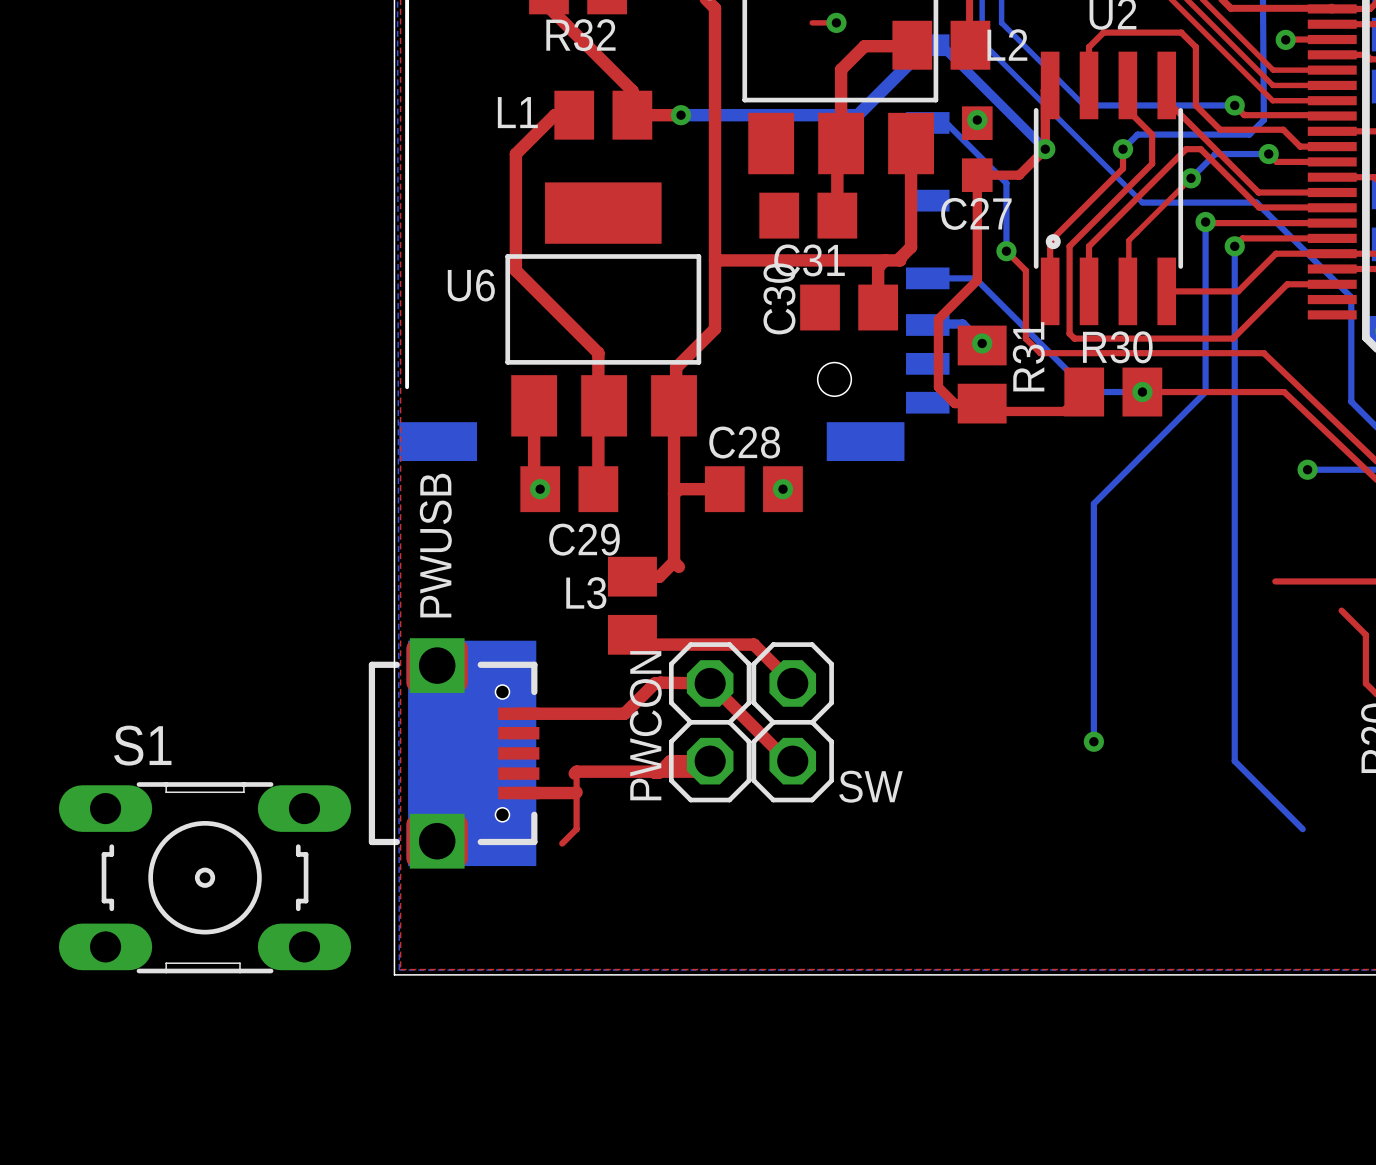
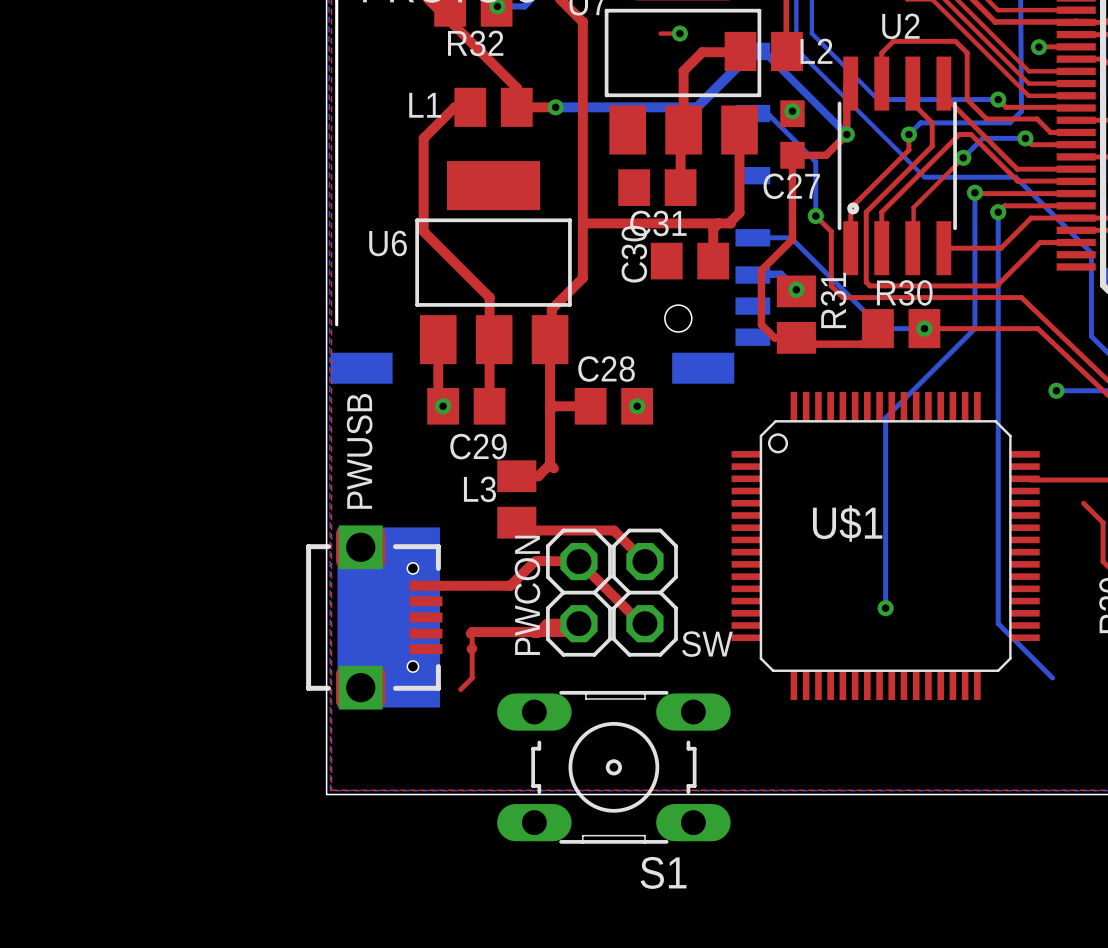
U$1: none -> (885, 546)
top track: (518, 793) (575, 793) -> none
S1 rotation: 0° (205, 877) -> 180° (613, 767)
S1 position: (205, 877) -> (613, 767)

